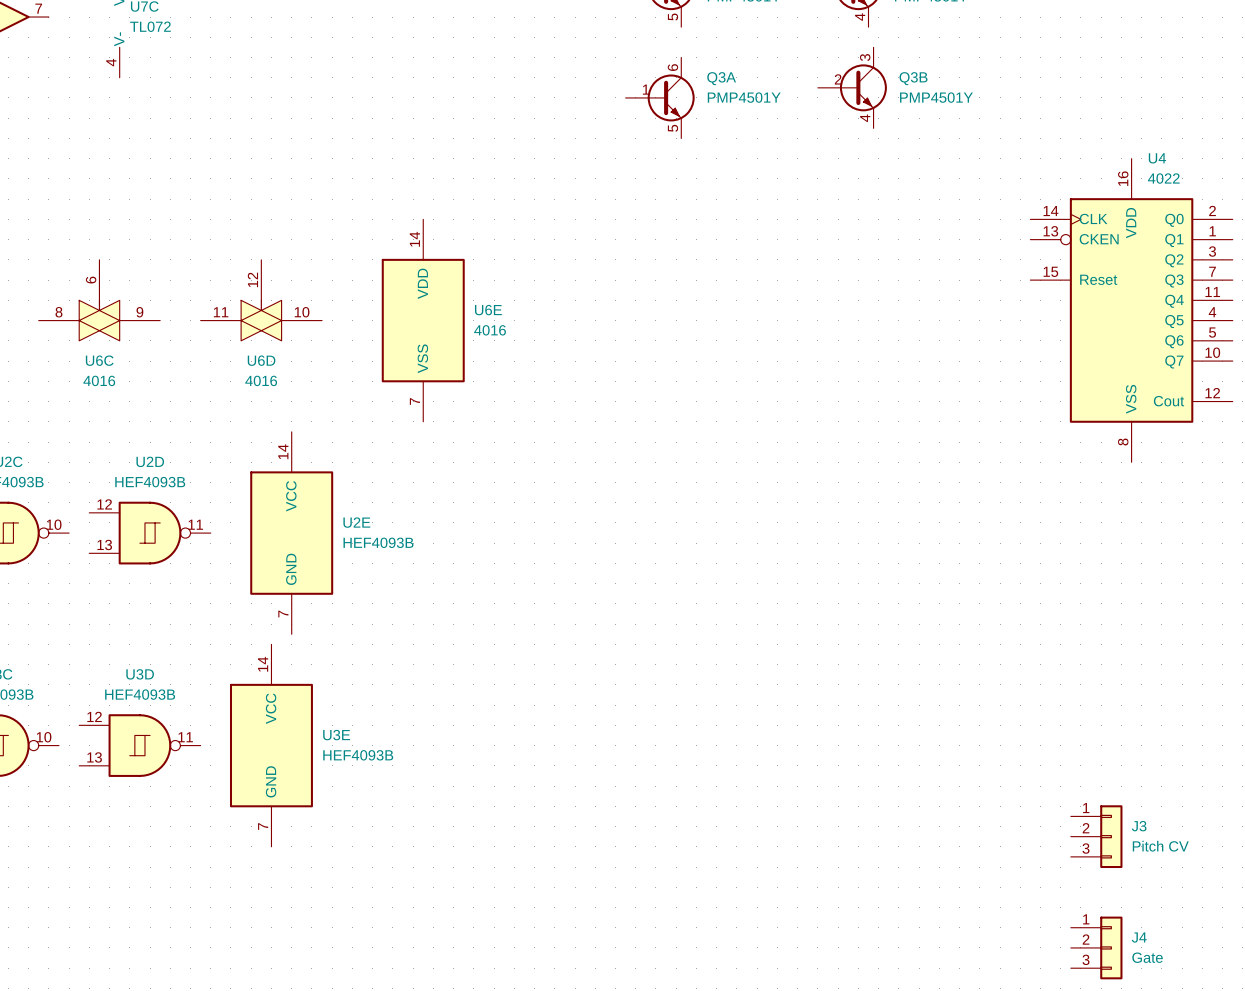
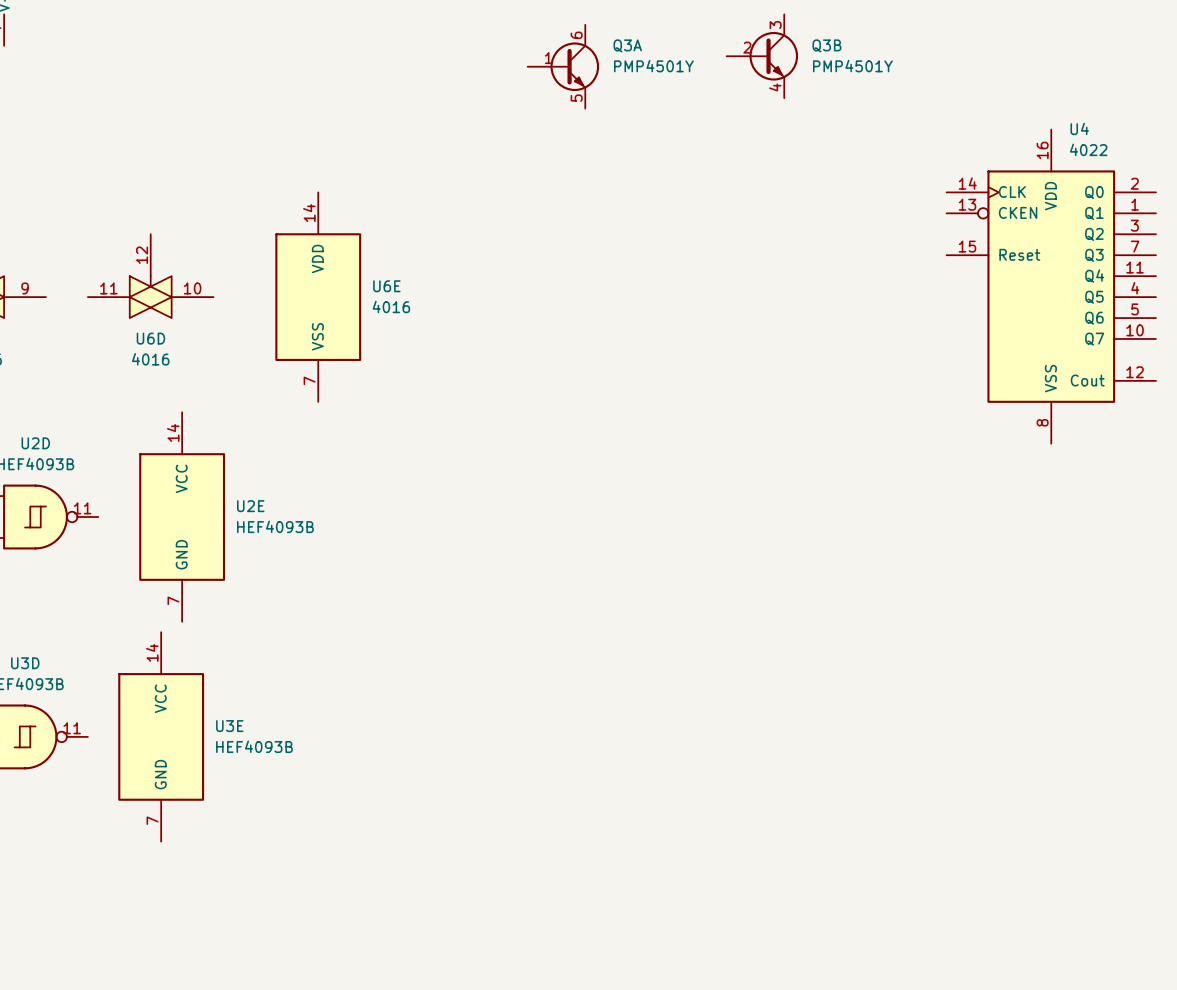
J3: Pitch CV (1096, 836) -> none
J4: Gate (1096, 947) -> none

